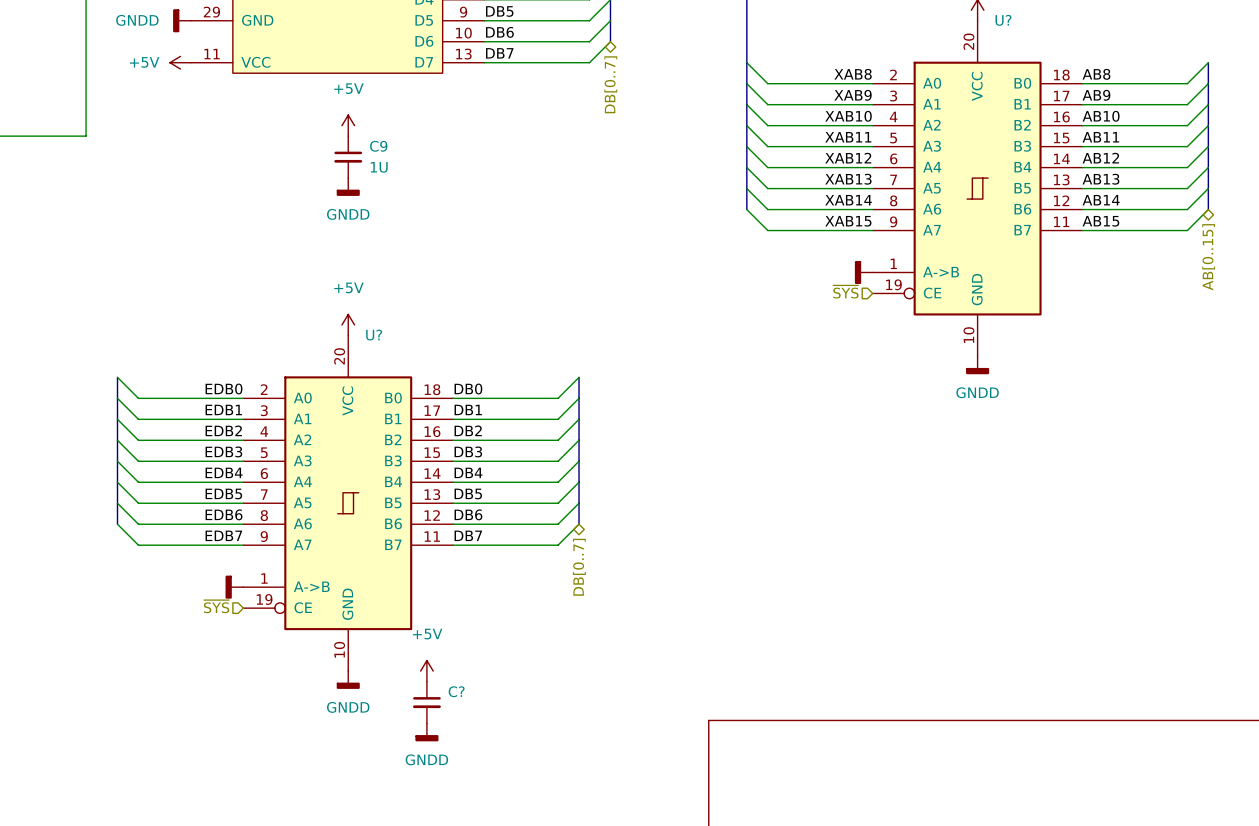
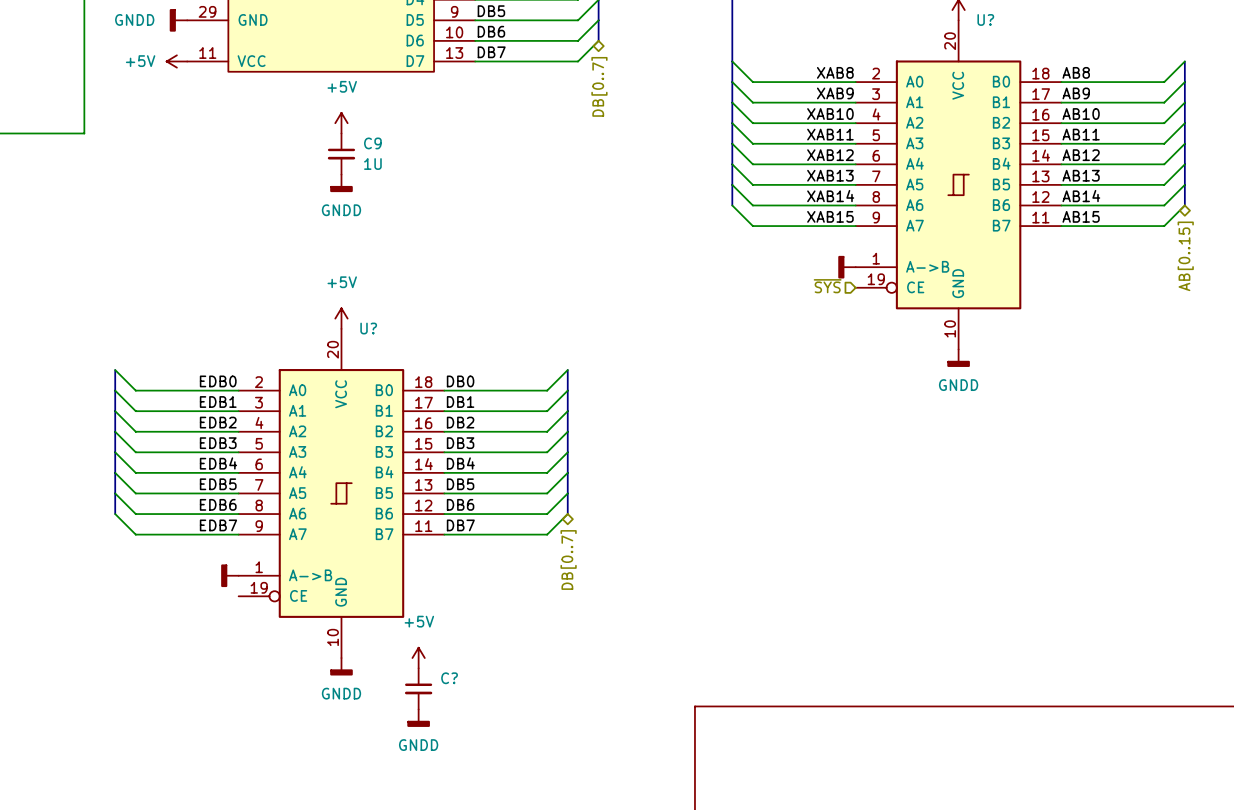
hierarchical label: ~{SYS} (216, 606) -> none

